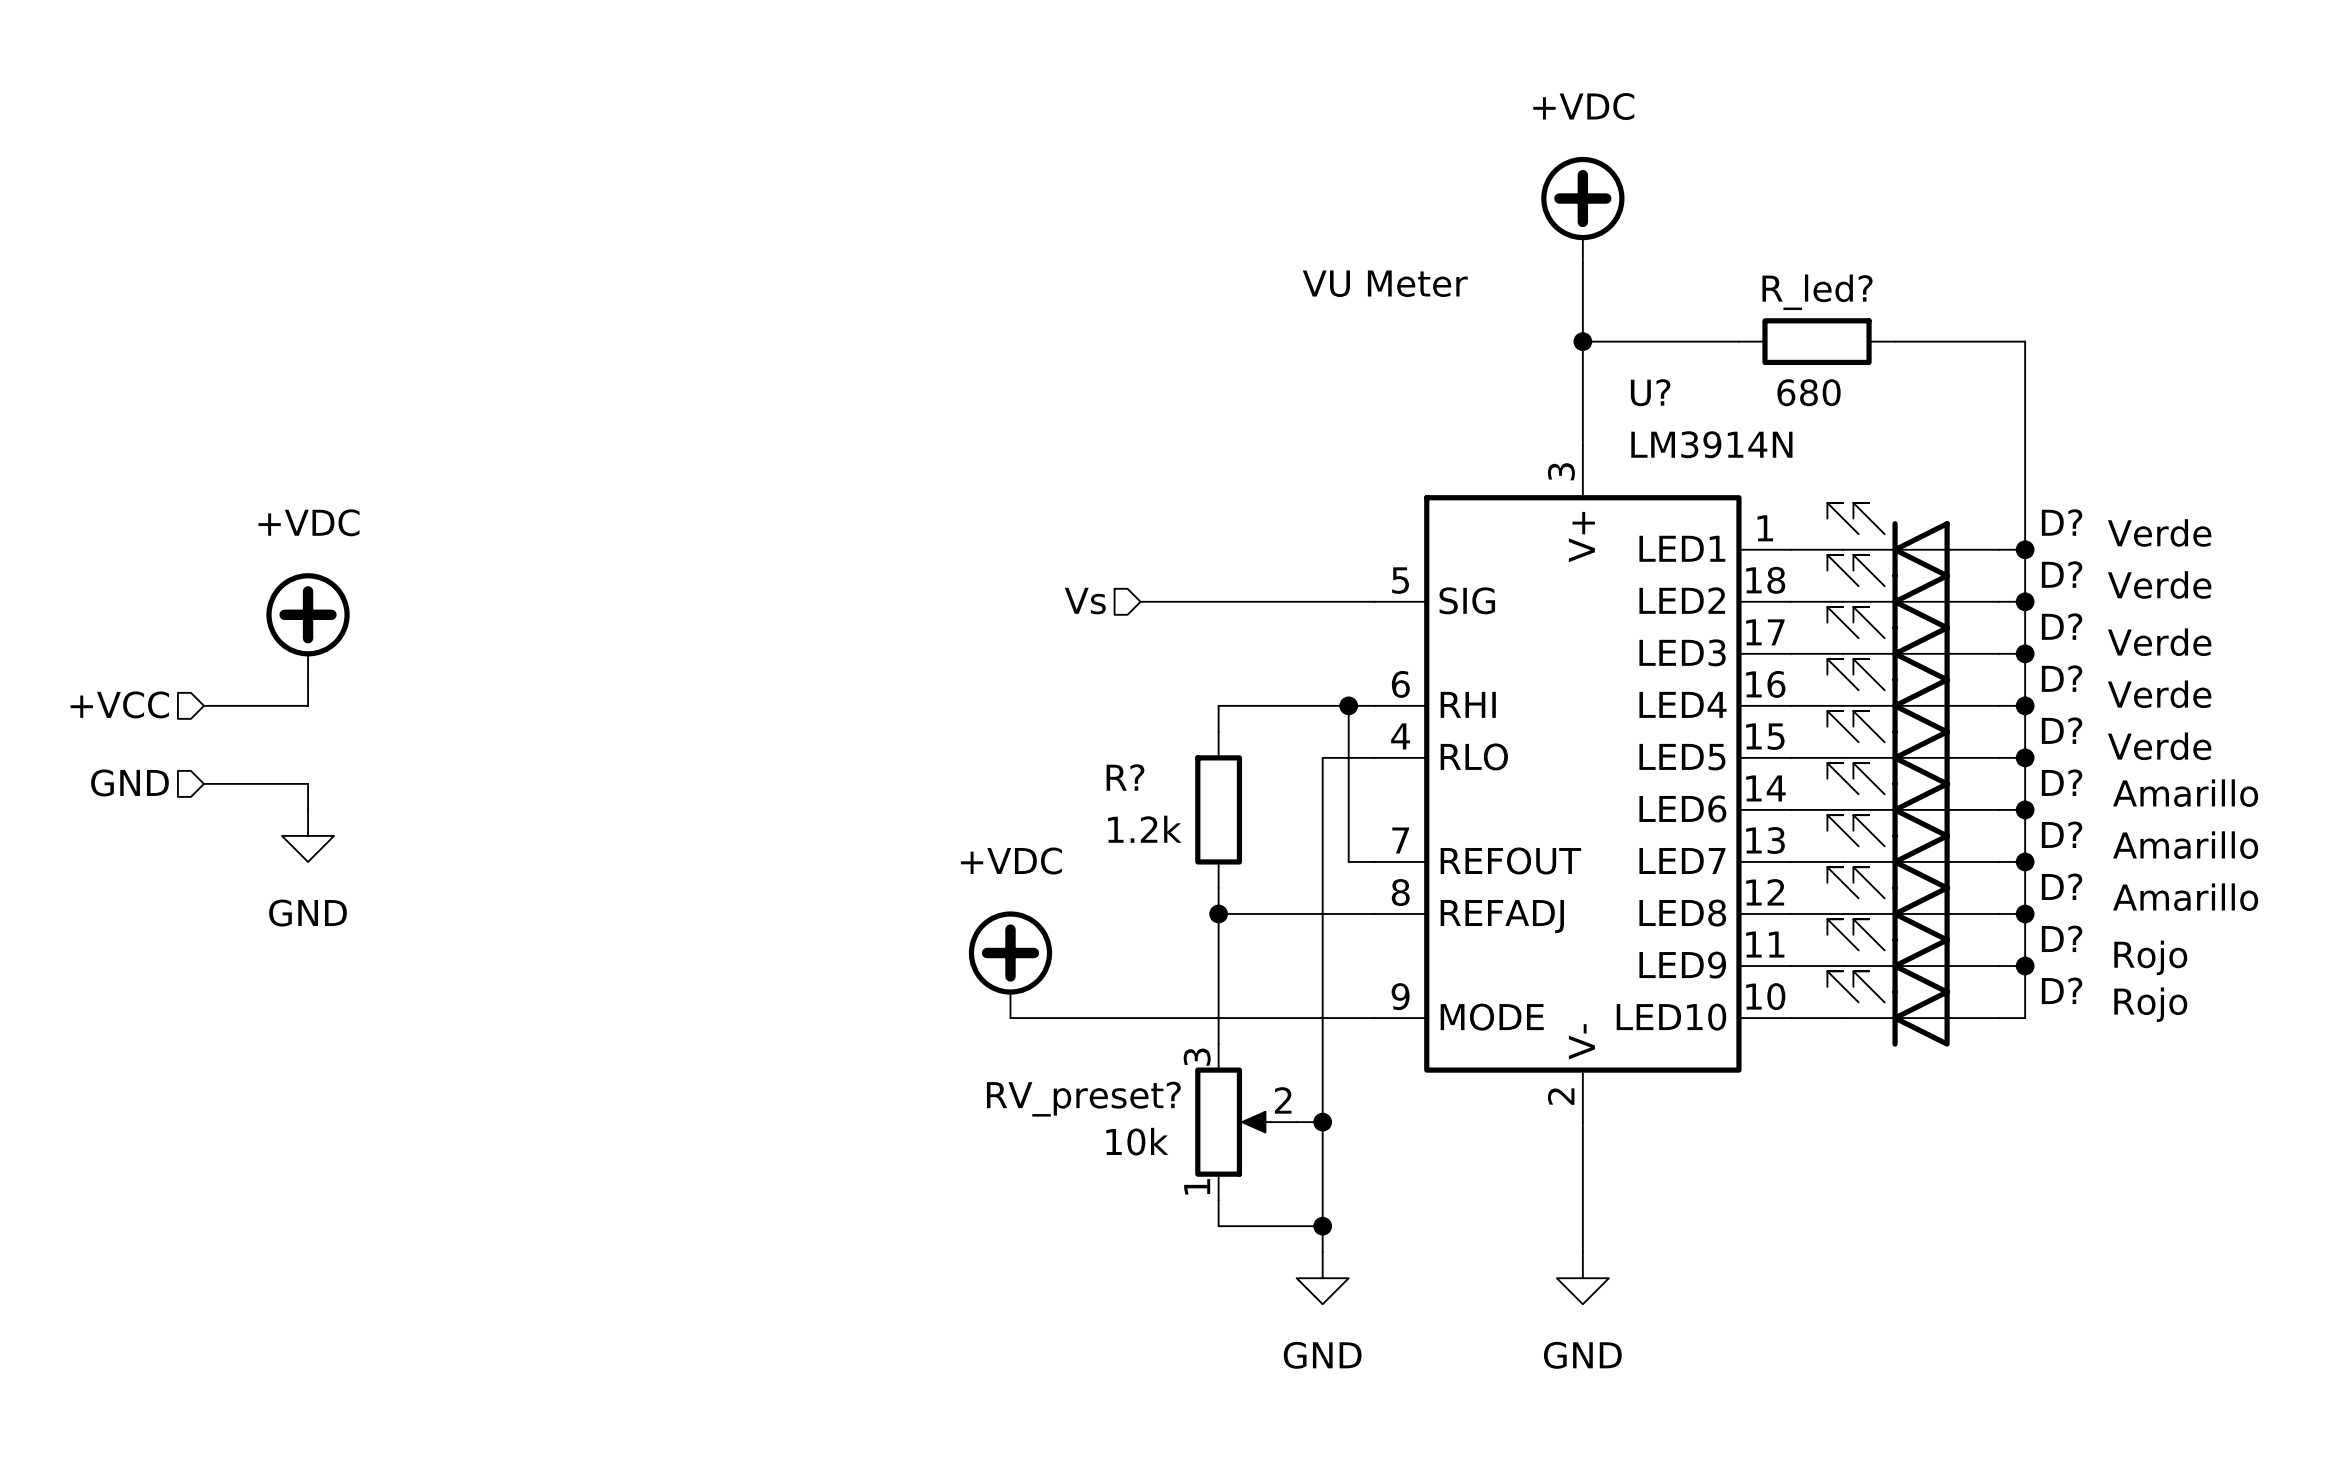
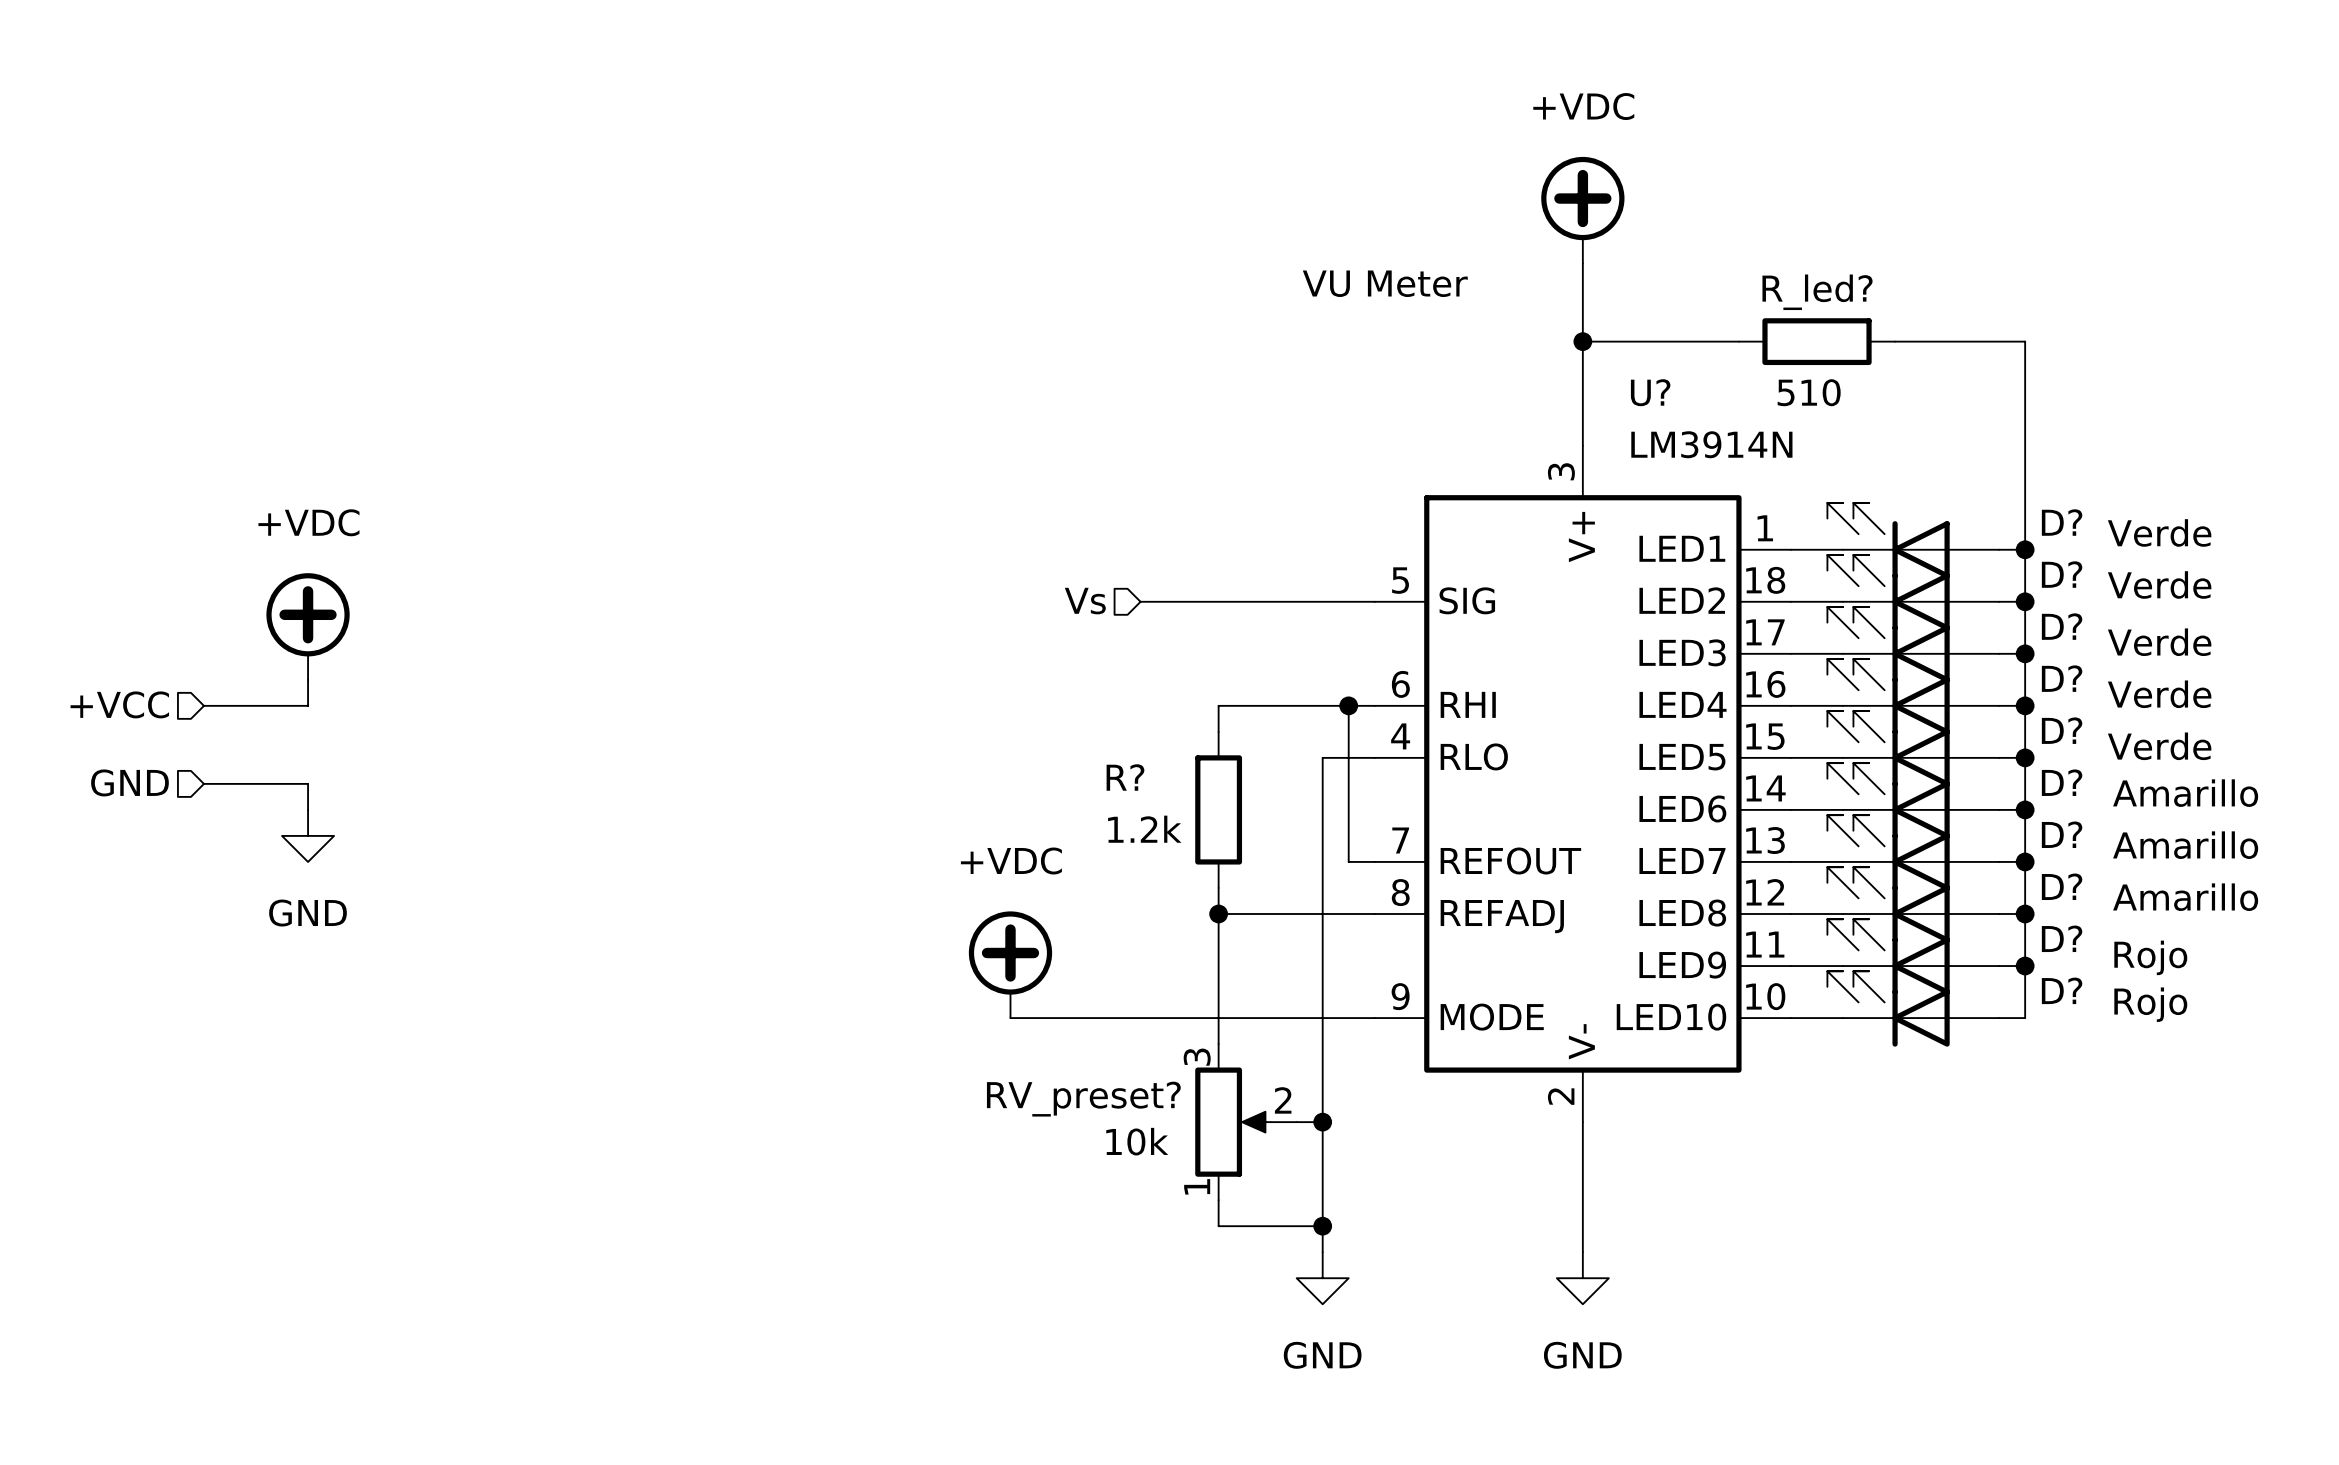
R_led? value: 680 (1809, 392) -> 510 (1809, 392)

